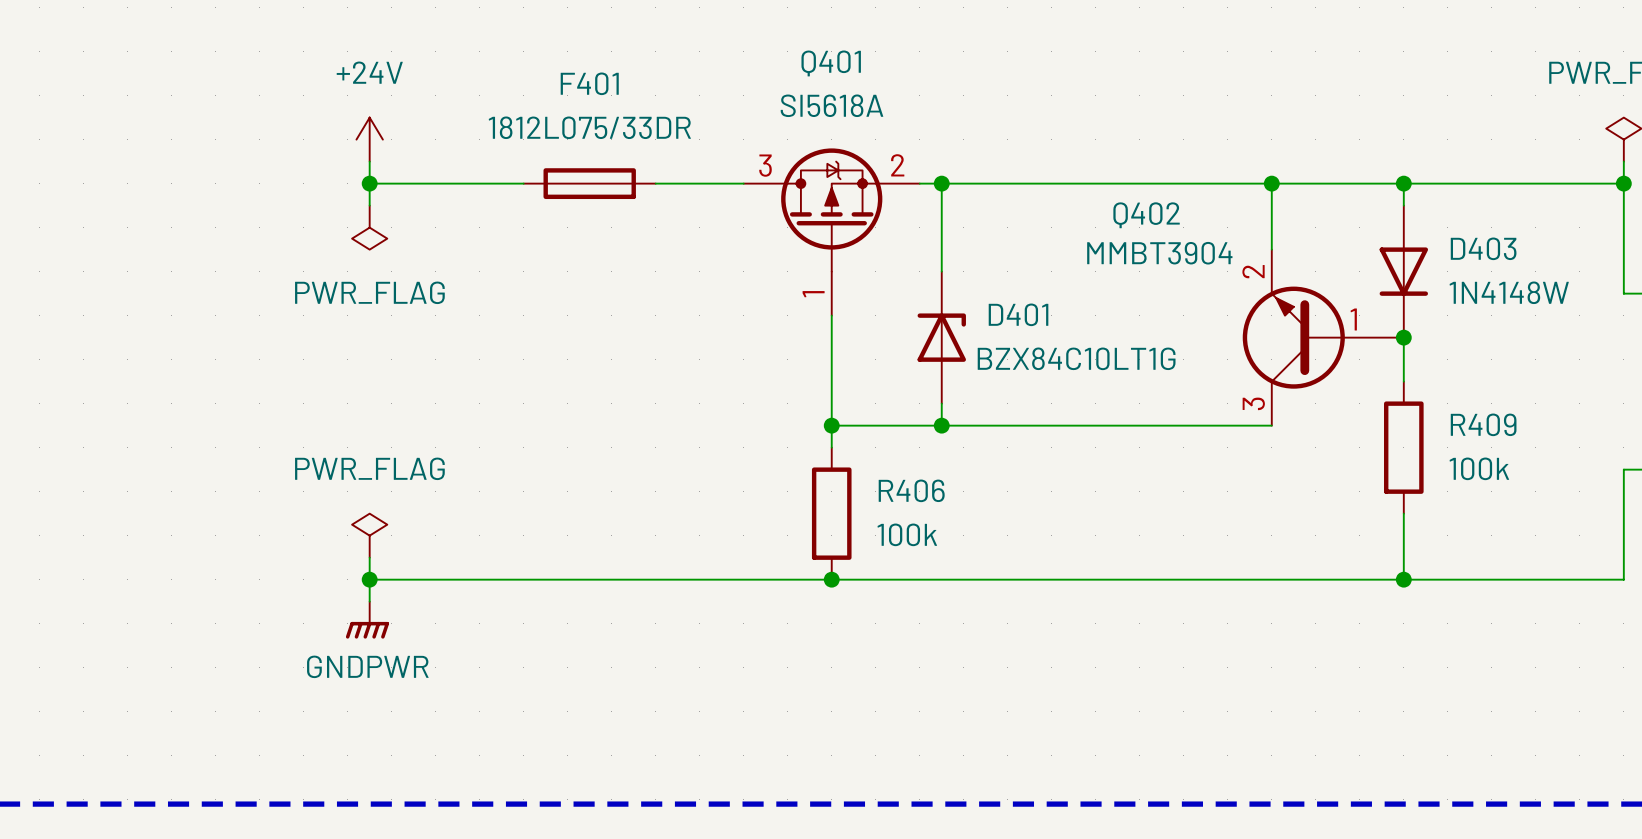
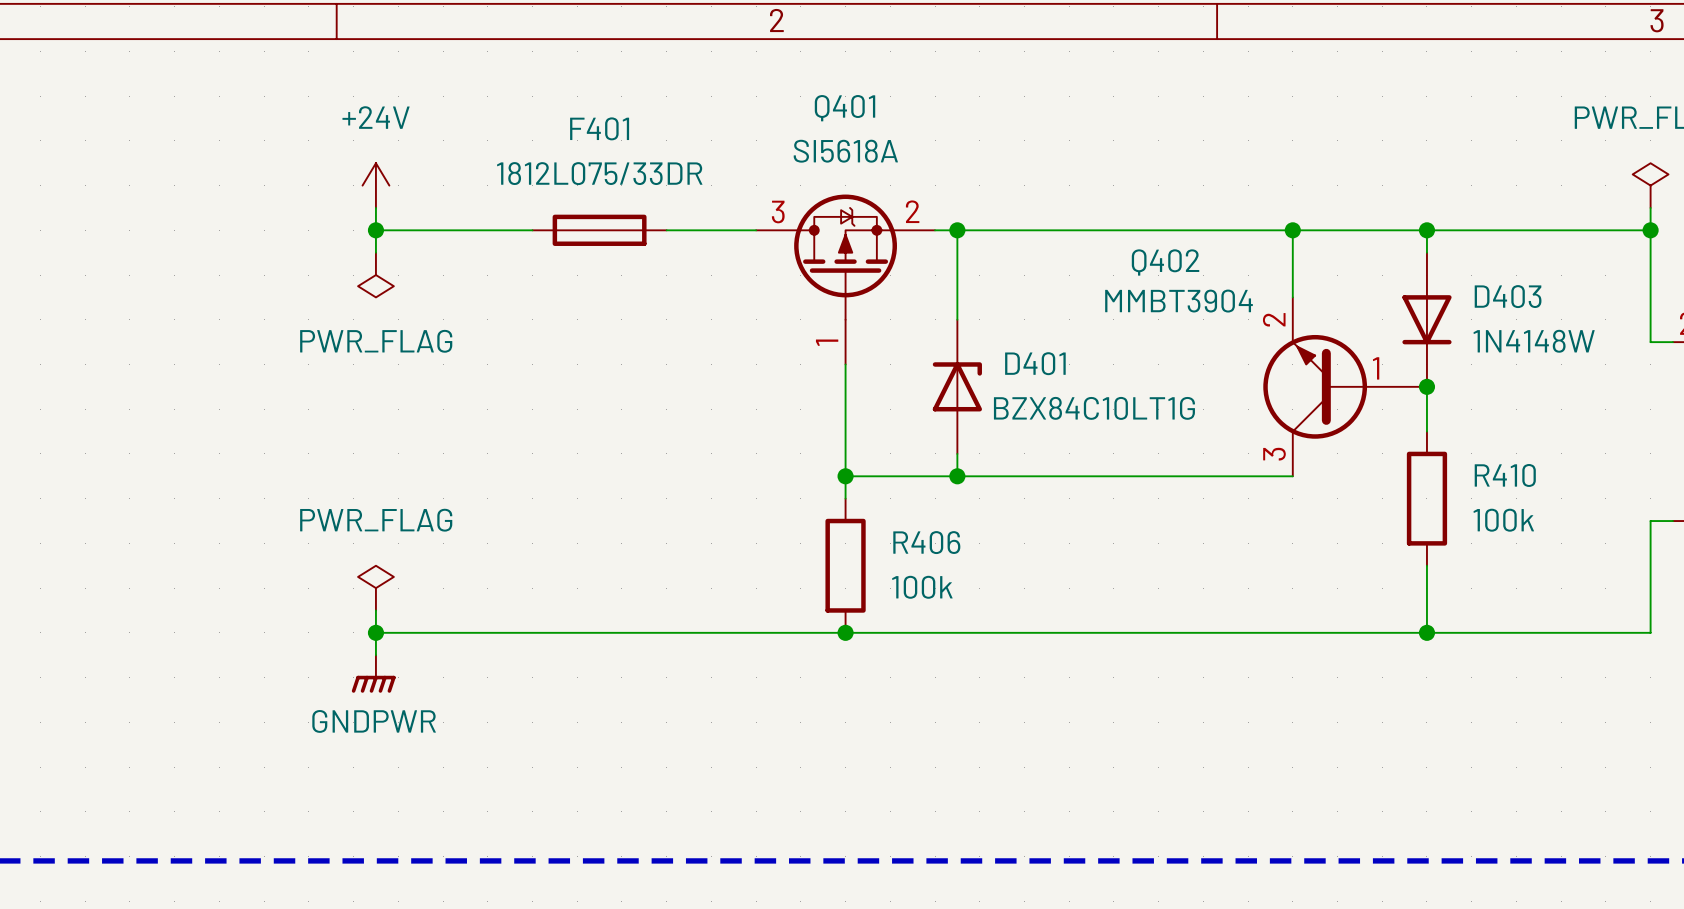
R409 name: R409 (1483, 424) -> R410 (1505, 475)

